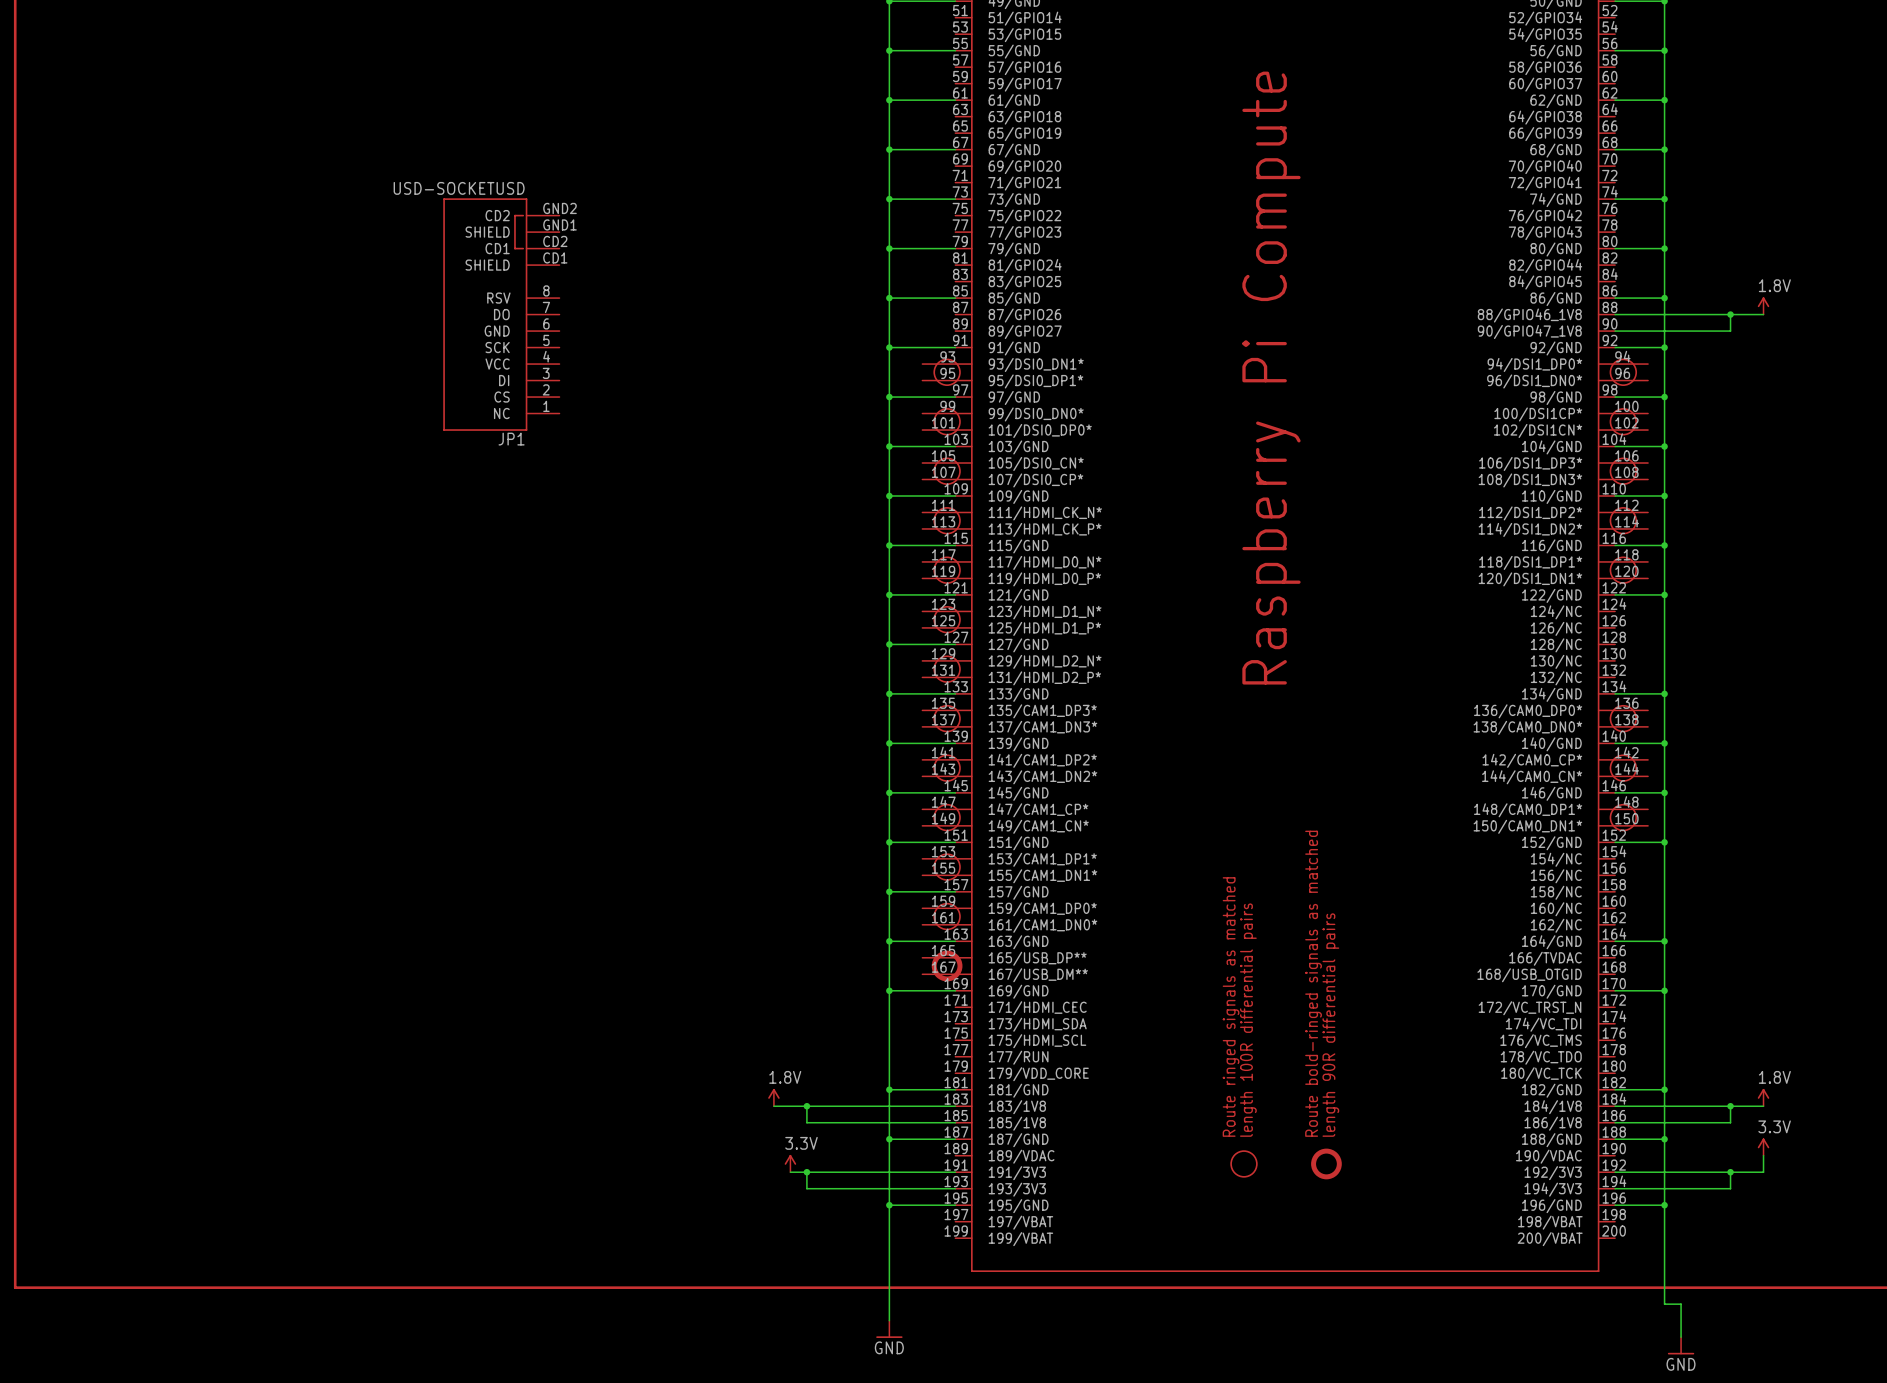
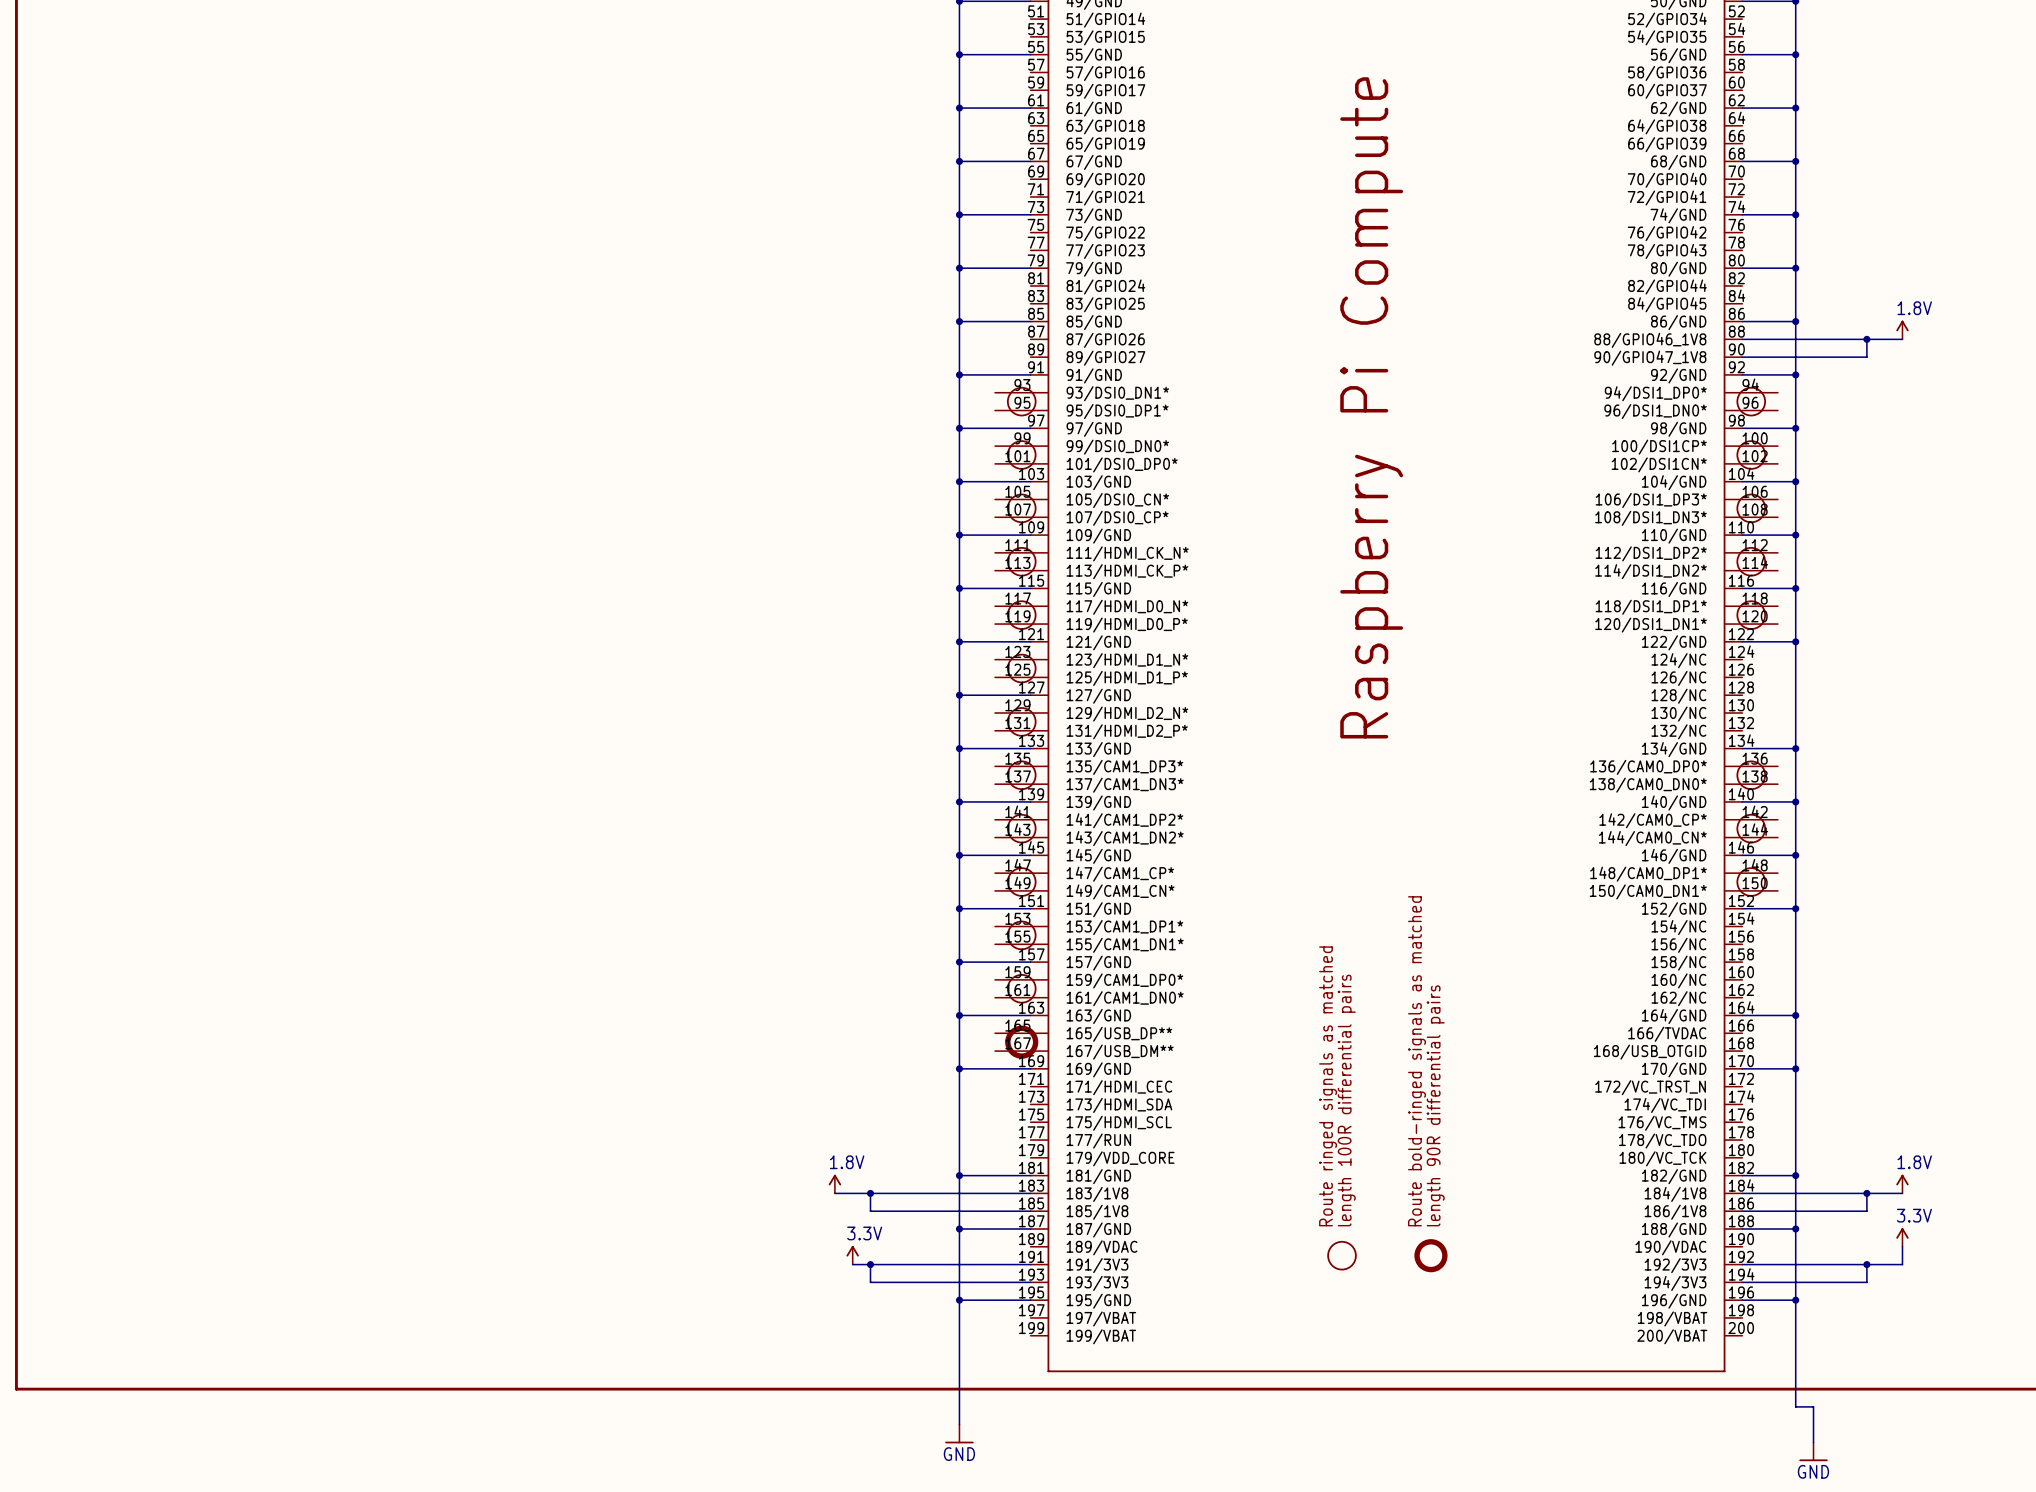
JP1: USD-SOCKETUSD (501, 314) -> none

